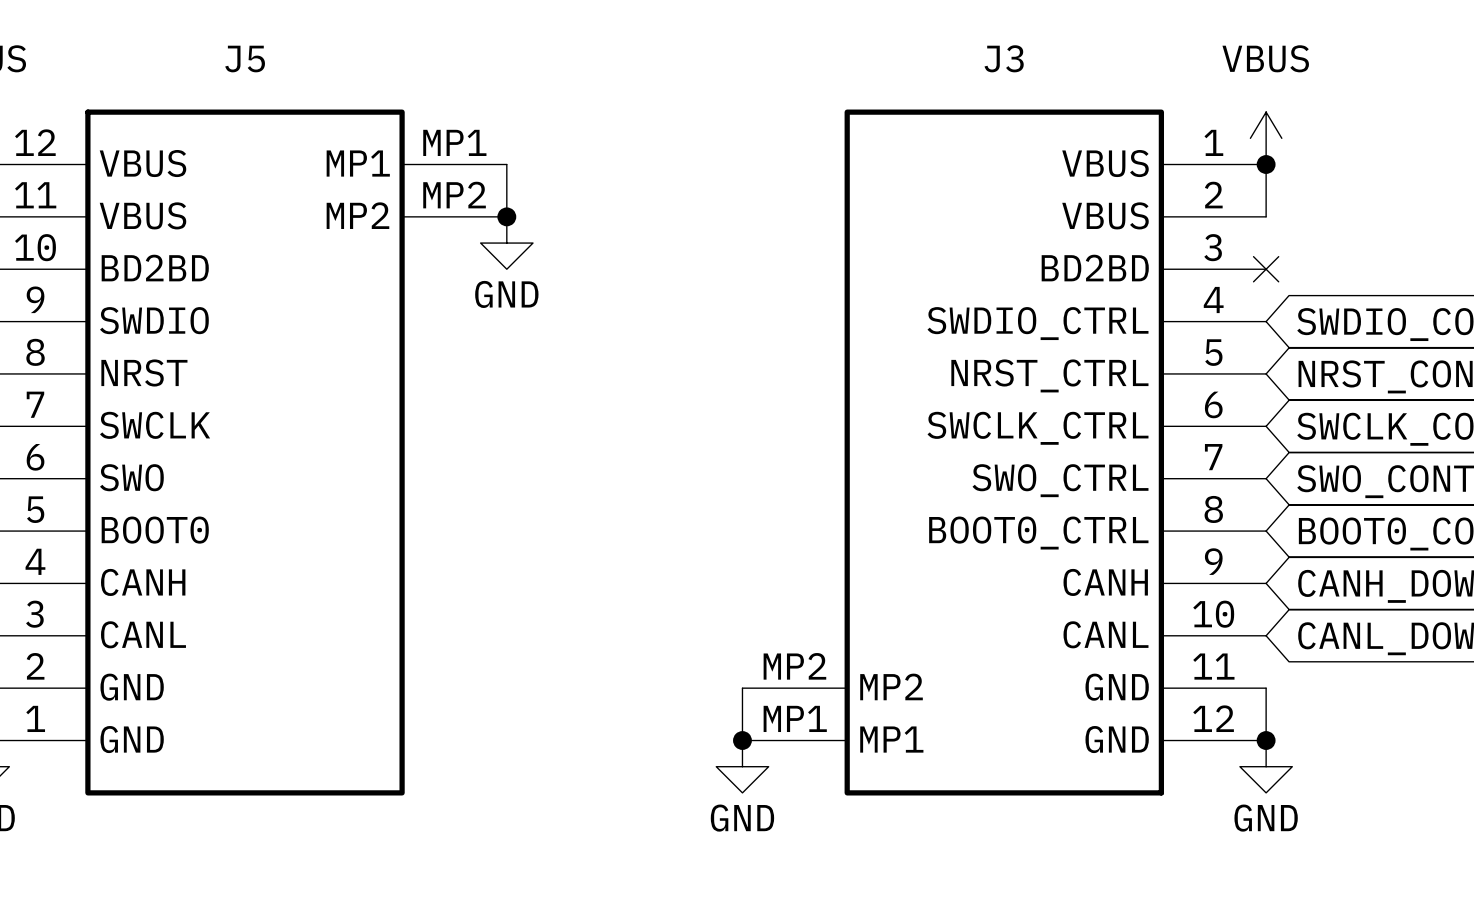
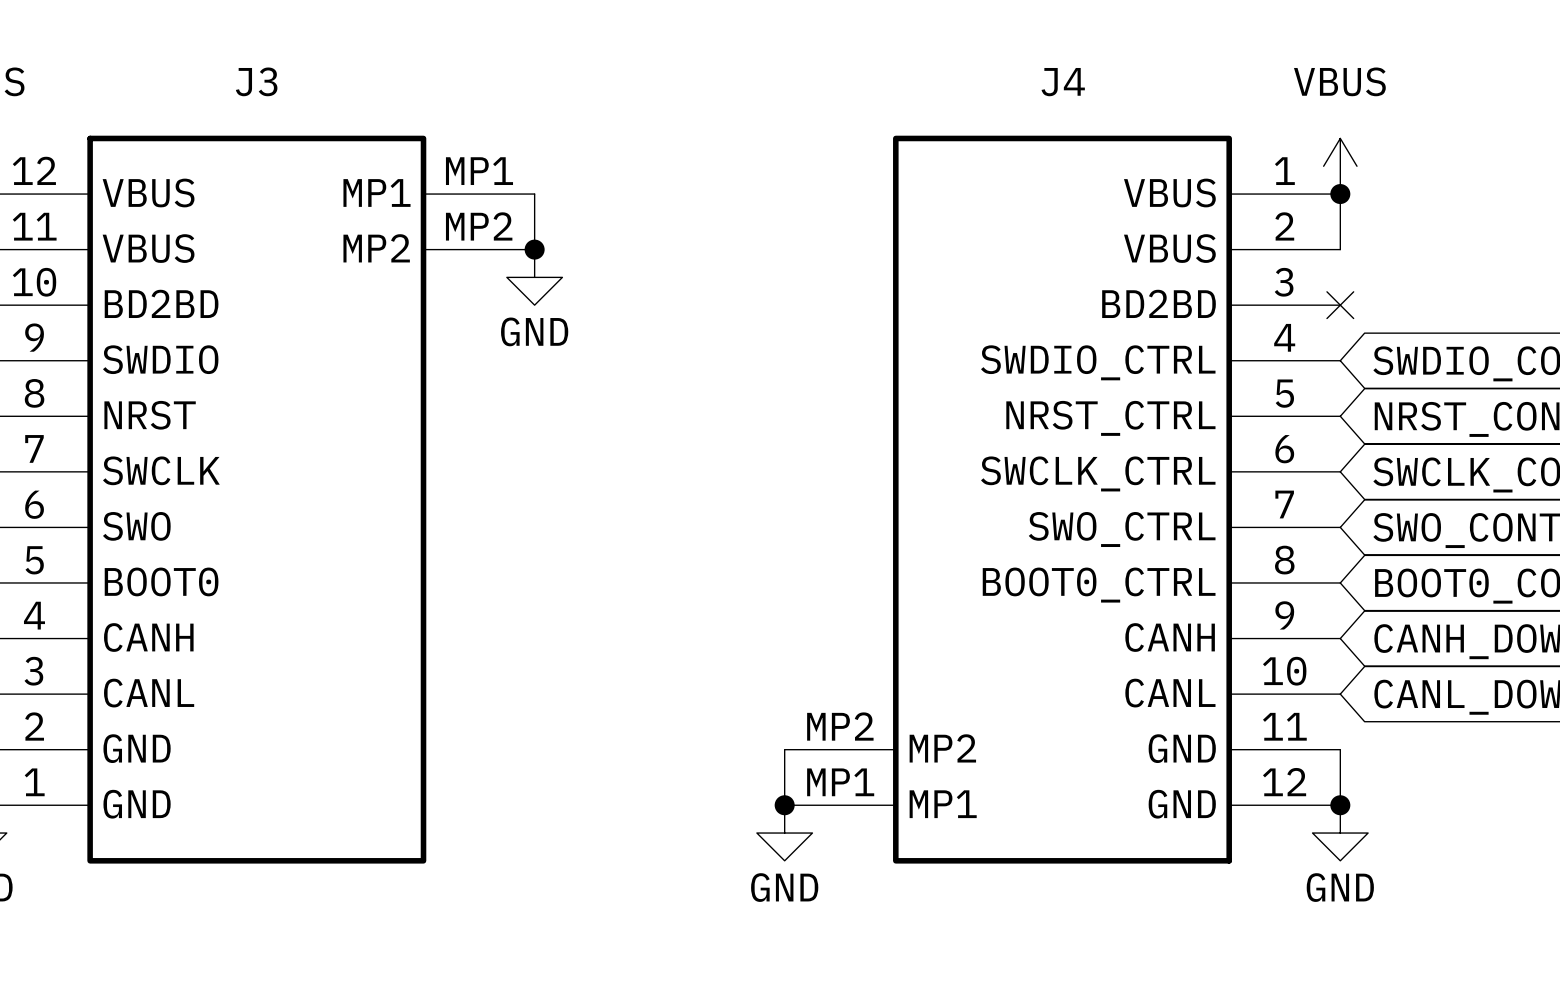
J3 name: J3 (1004, 58) -> J4 (1063, 82)
J5 name: J5 (245, 59) -> J3 (256, 81)

